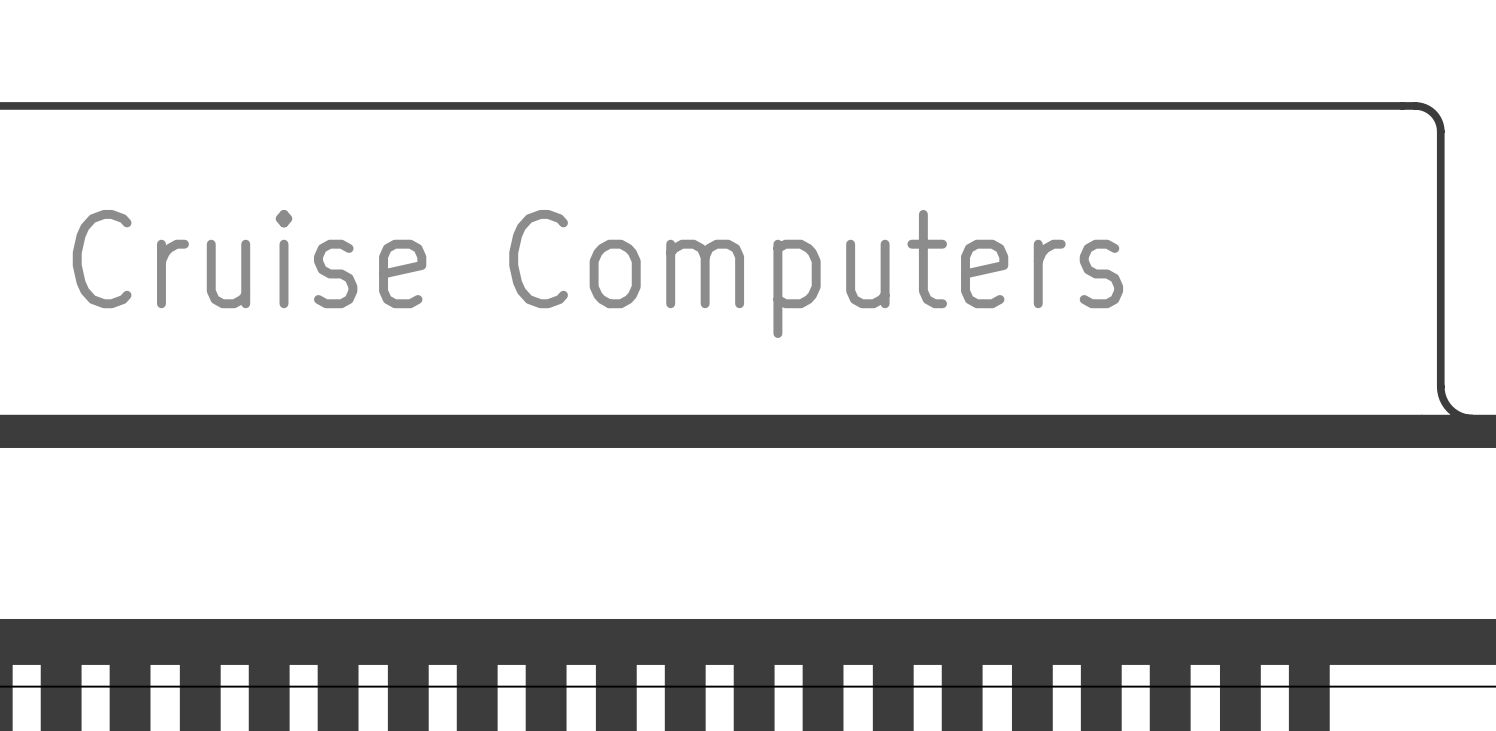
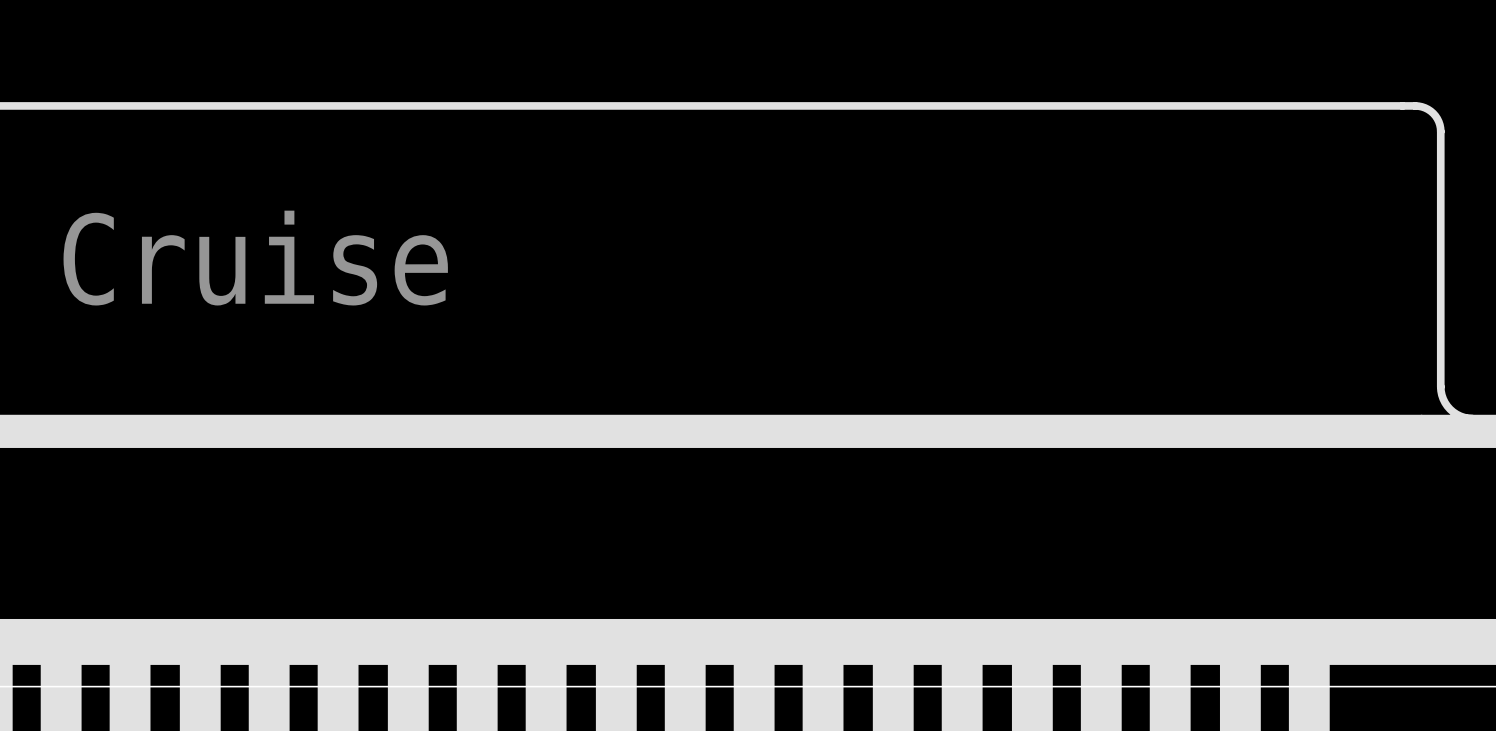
part value: Cruise Computers (597, 273) -> Cruise (255, 258)

